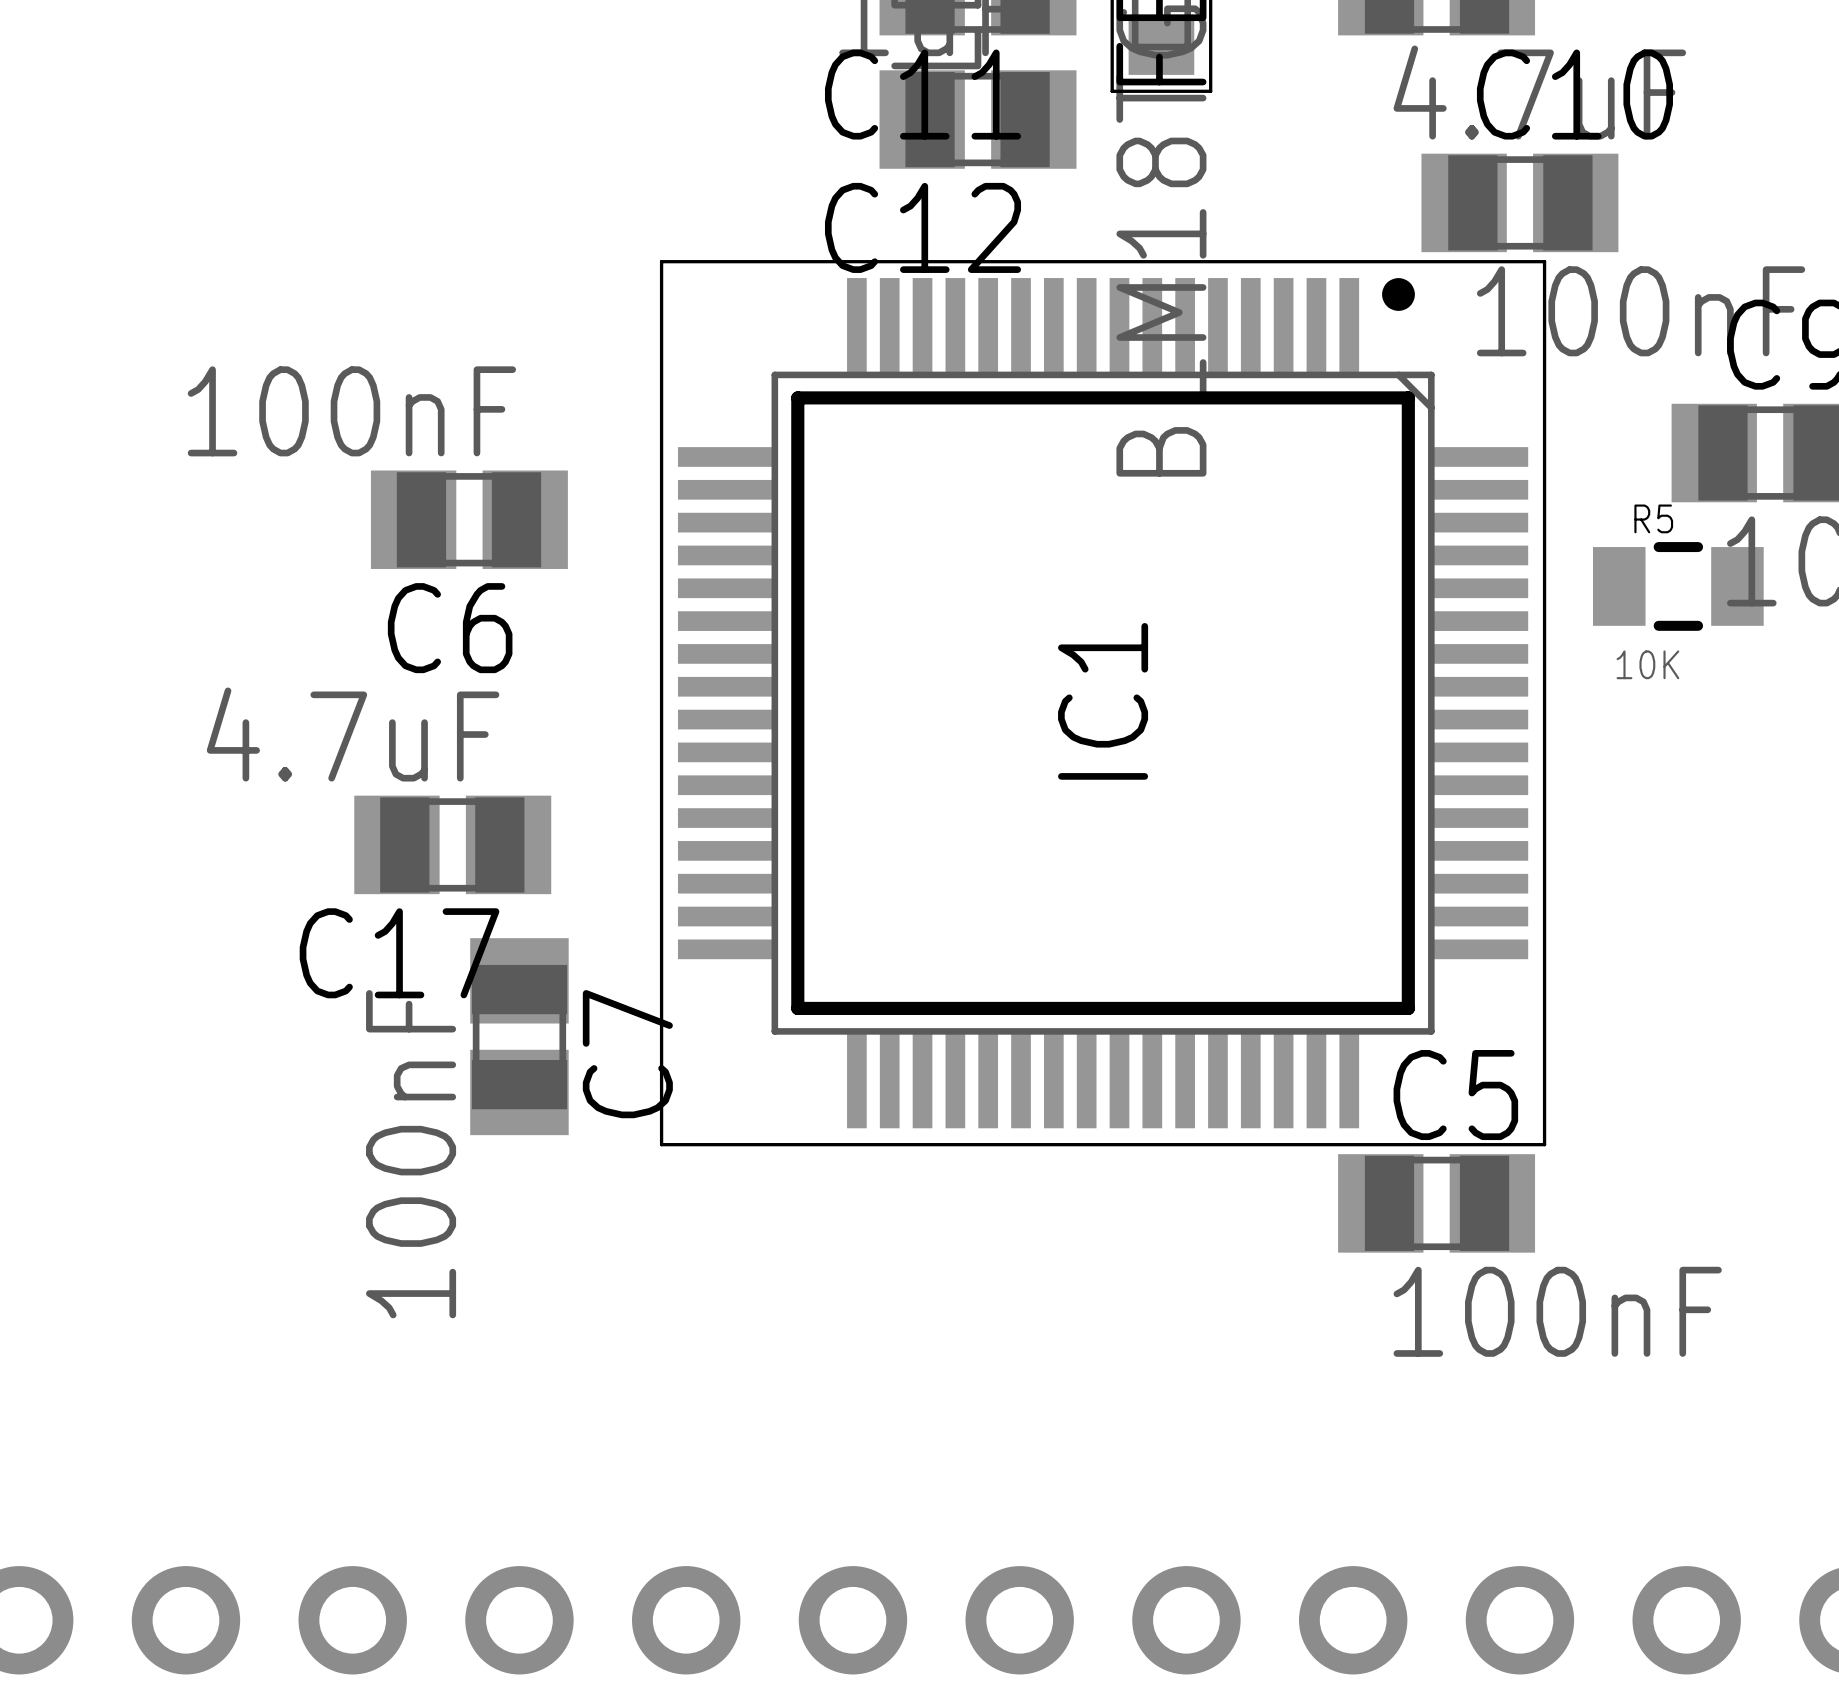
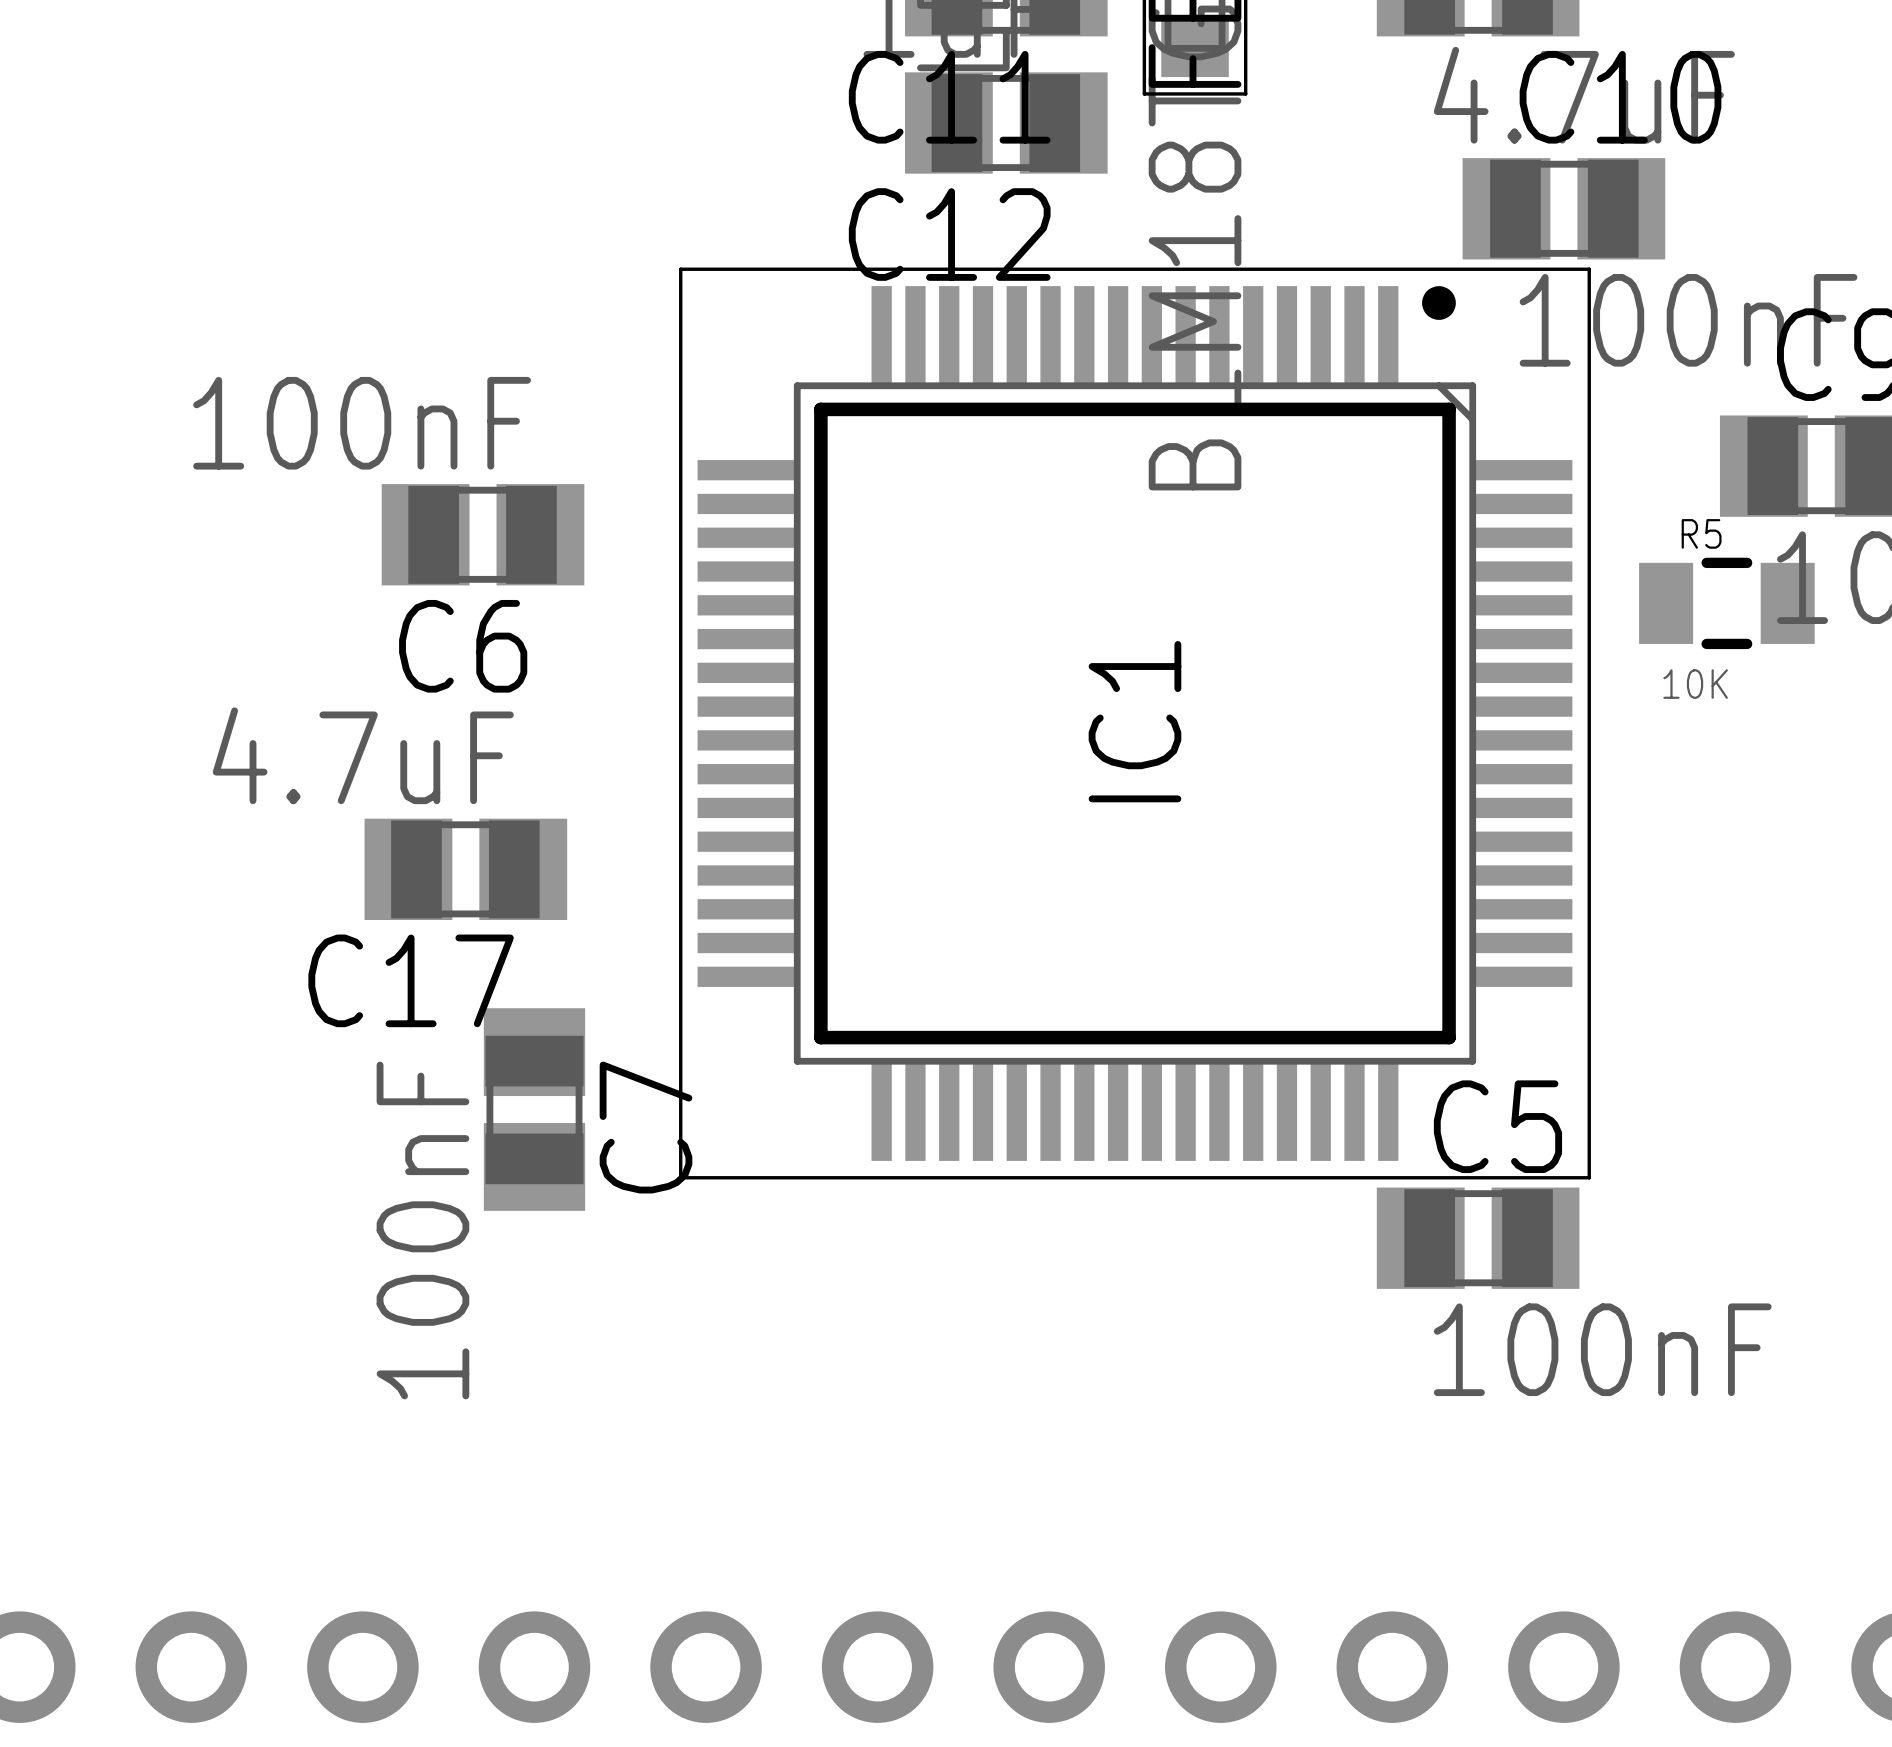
C7 position: (519, 1036) -> (534, 1109)

